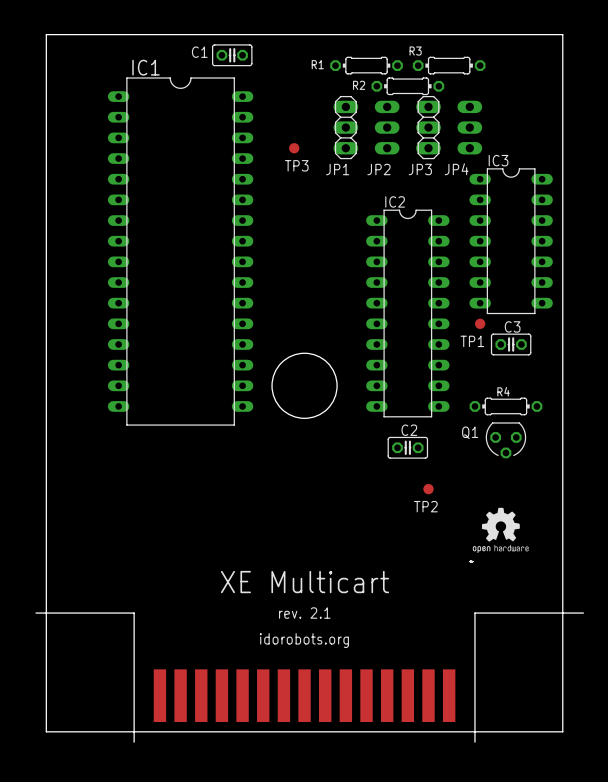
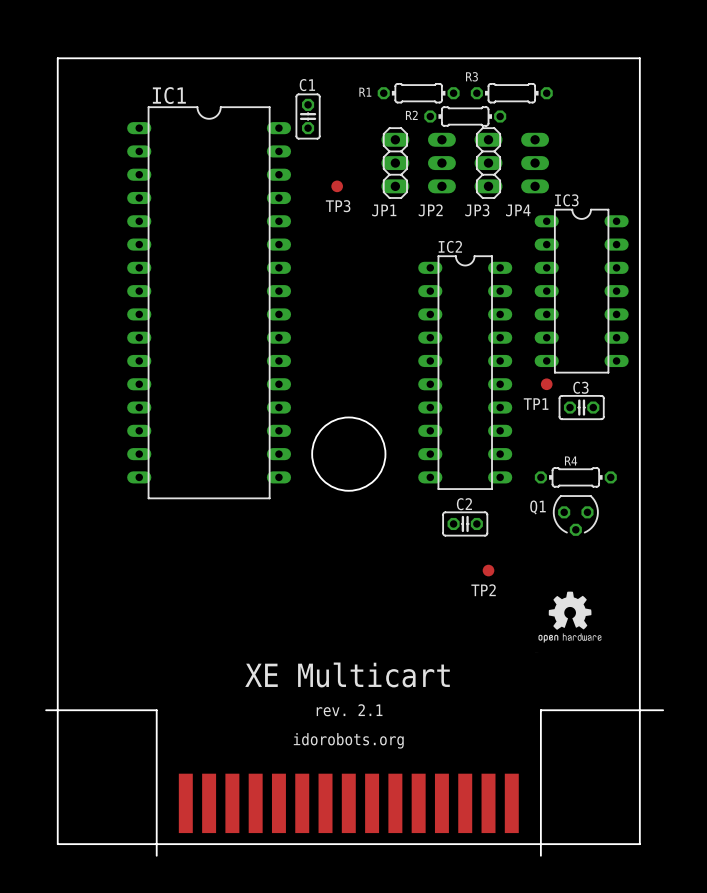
C1 rotation: 0° (232, 55) -> 90° clockwise (308, 116)
C1 position: (232, 55) -> (308, 116)

